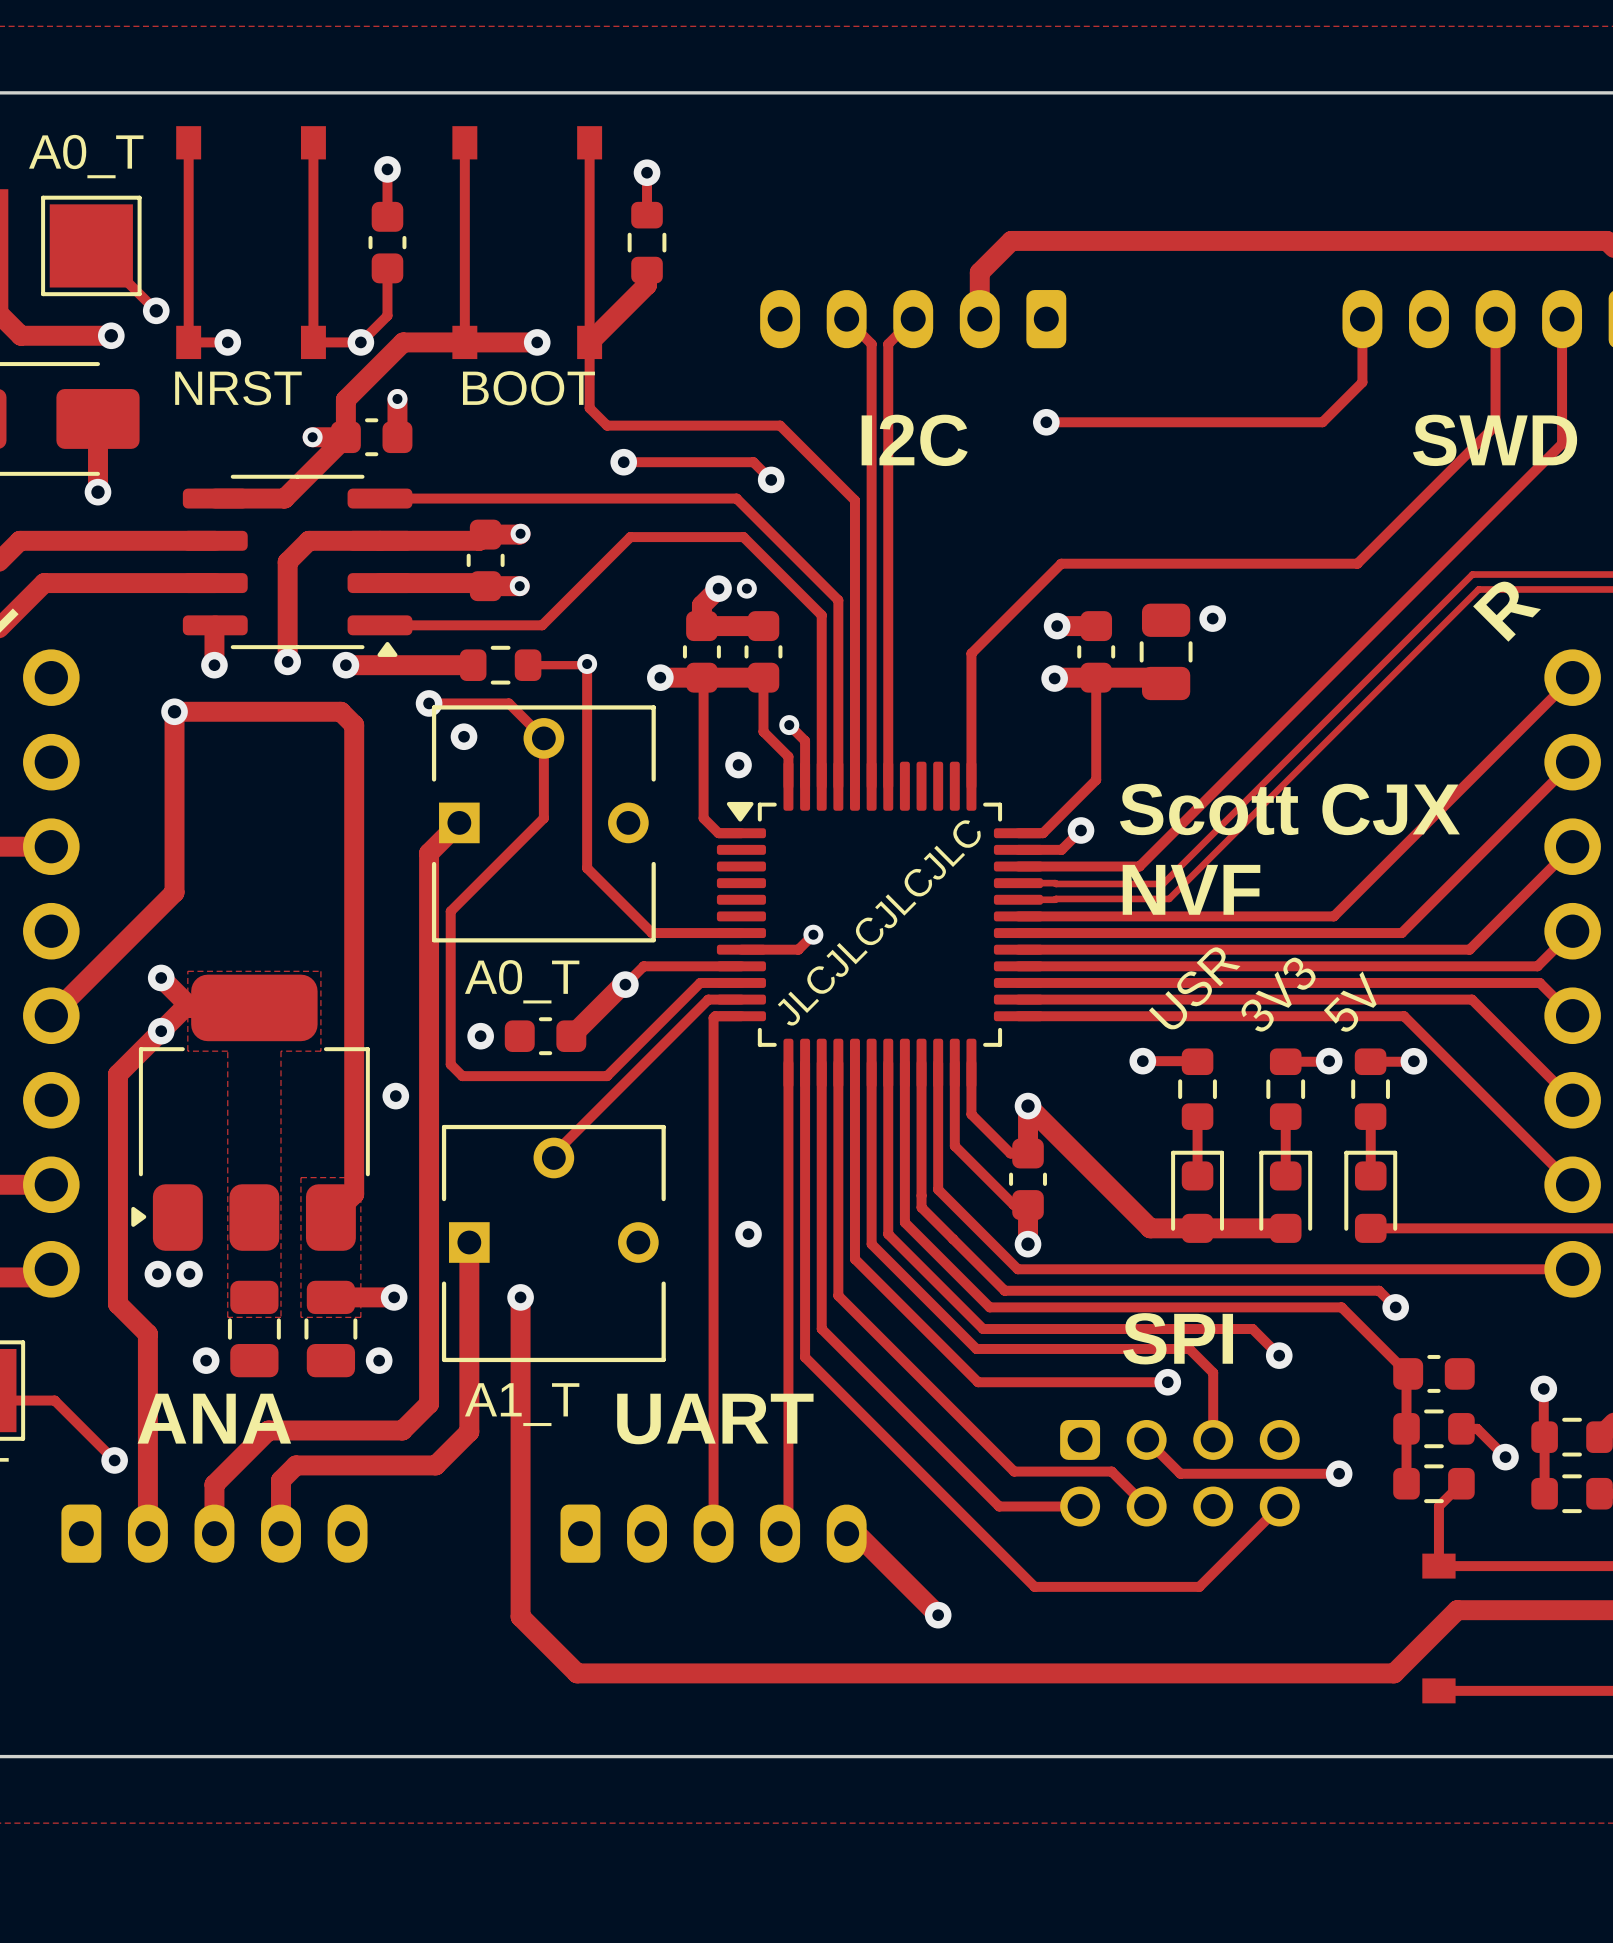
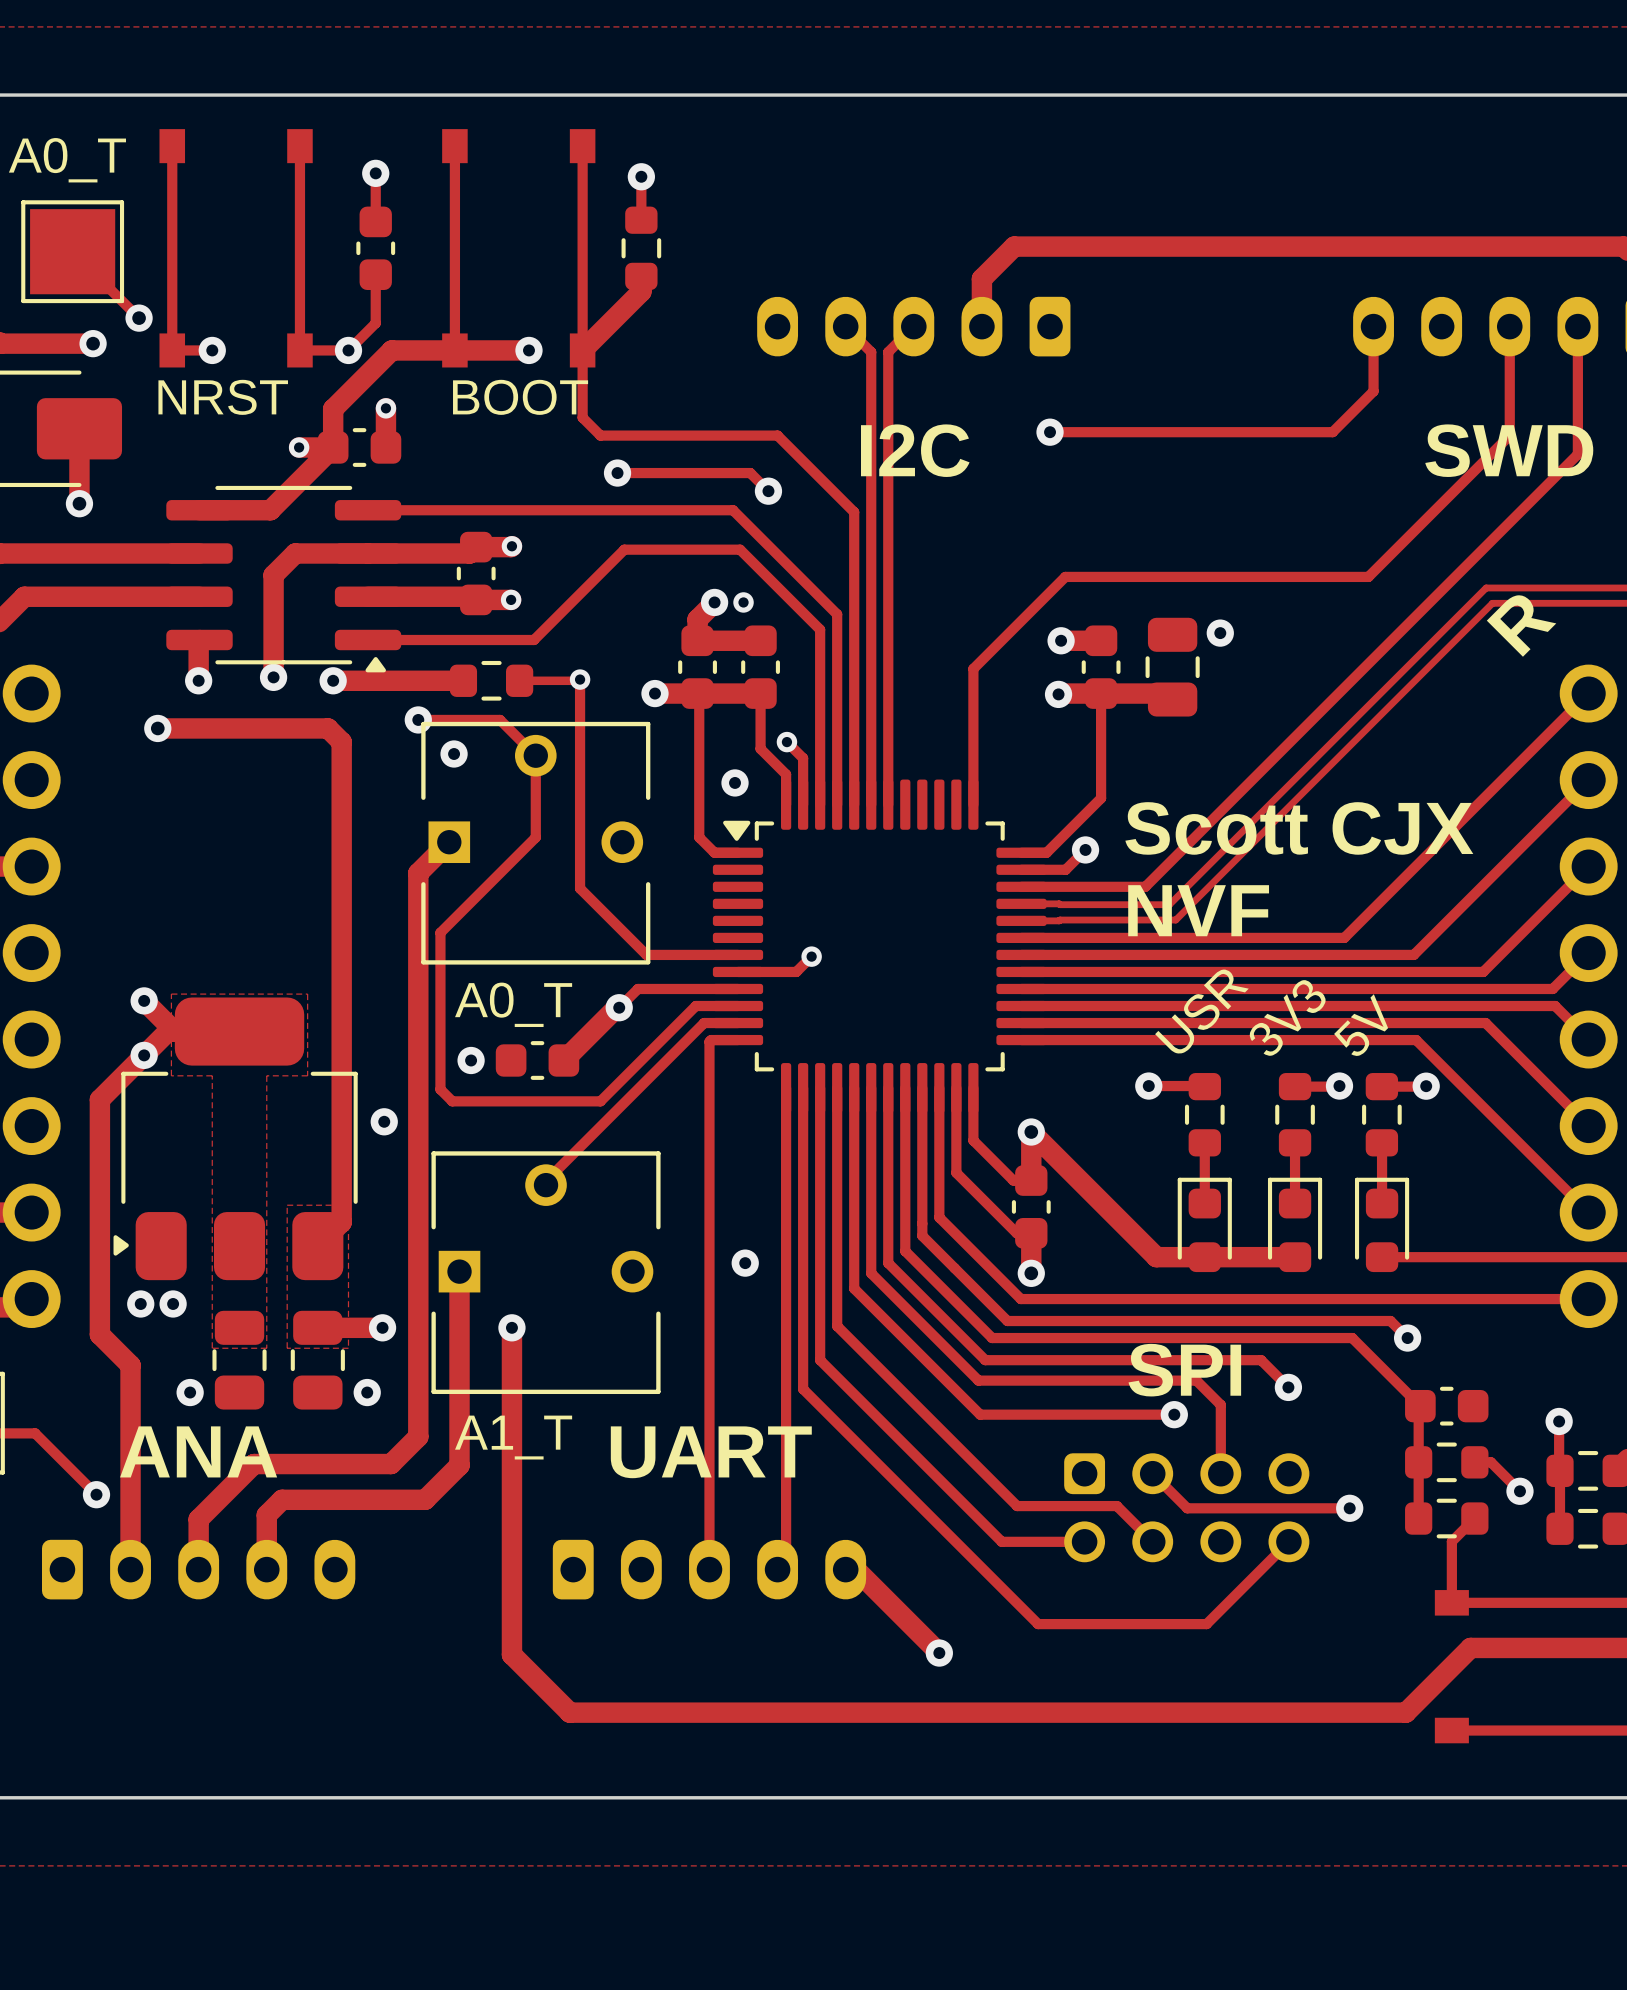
track: (174, 711) (174, 892) (51, 1015) -> none
text: JLCJLCJLCJLC (879, 923) -> none

